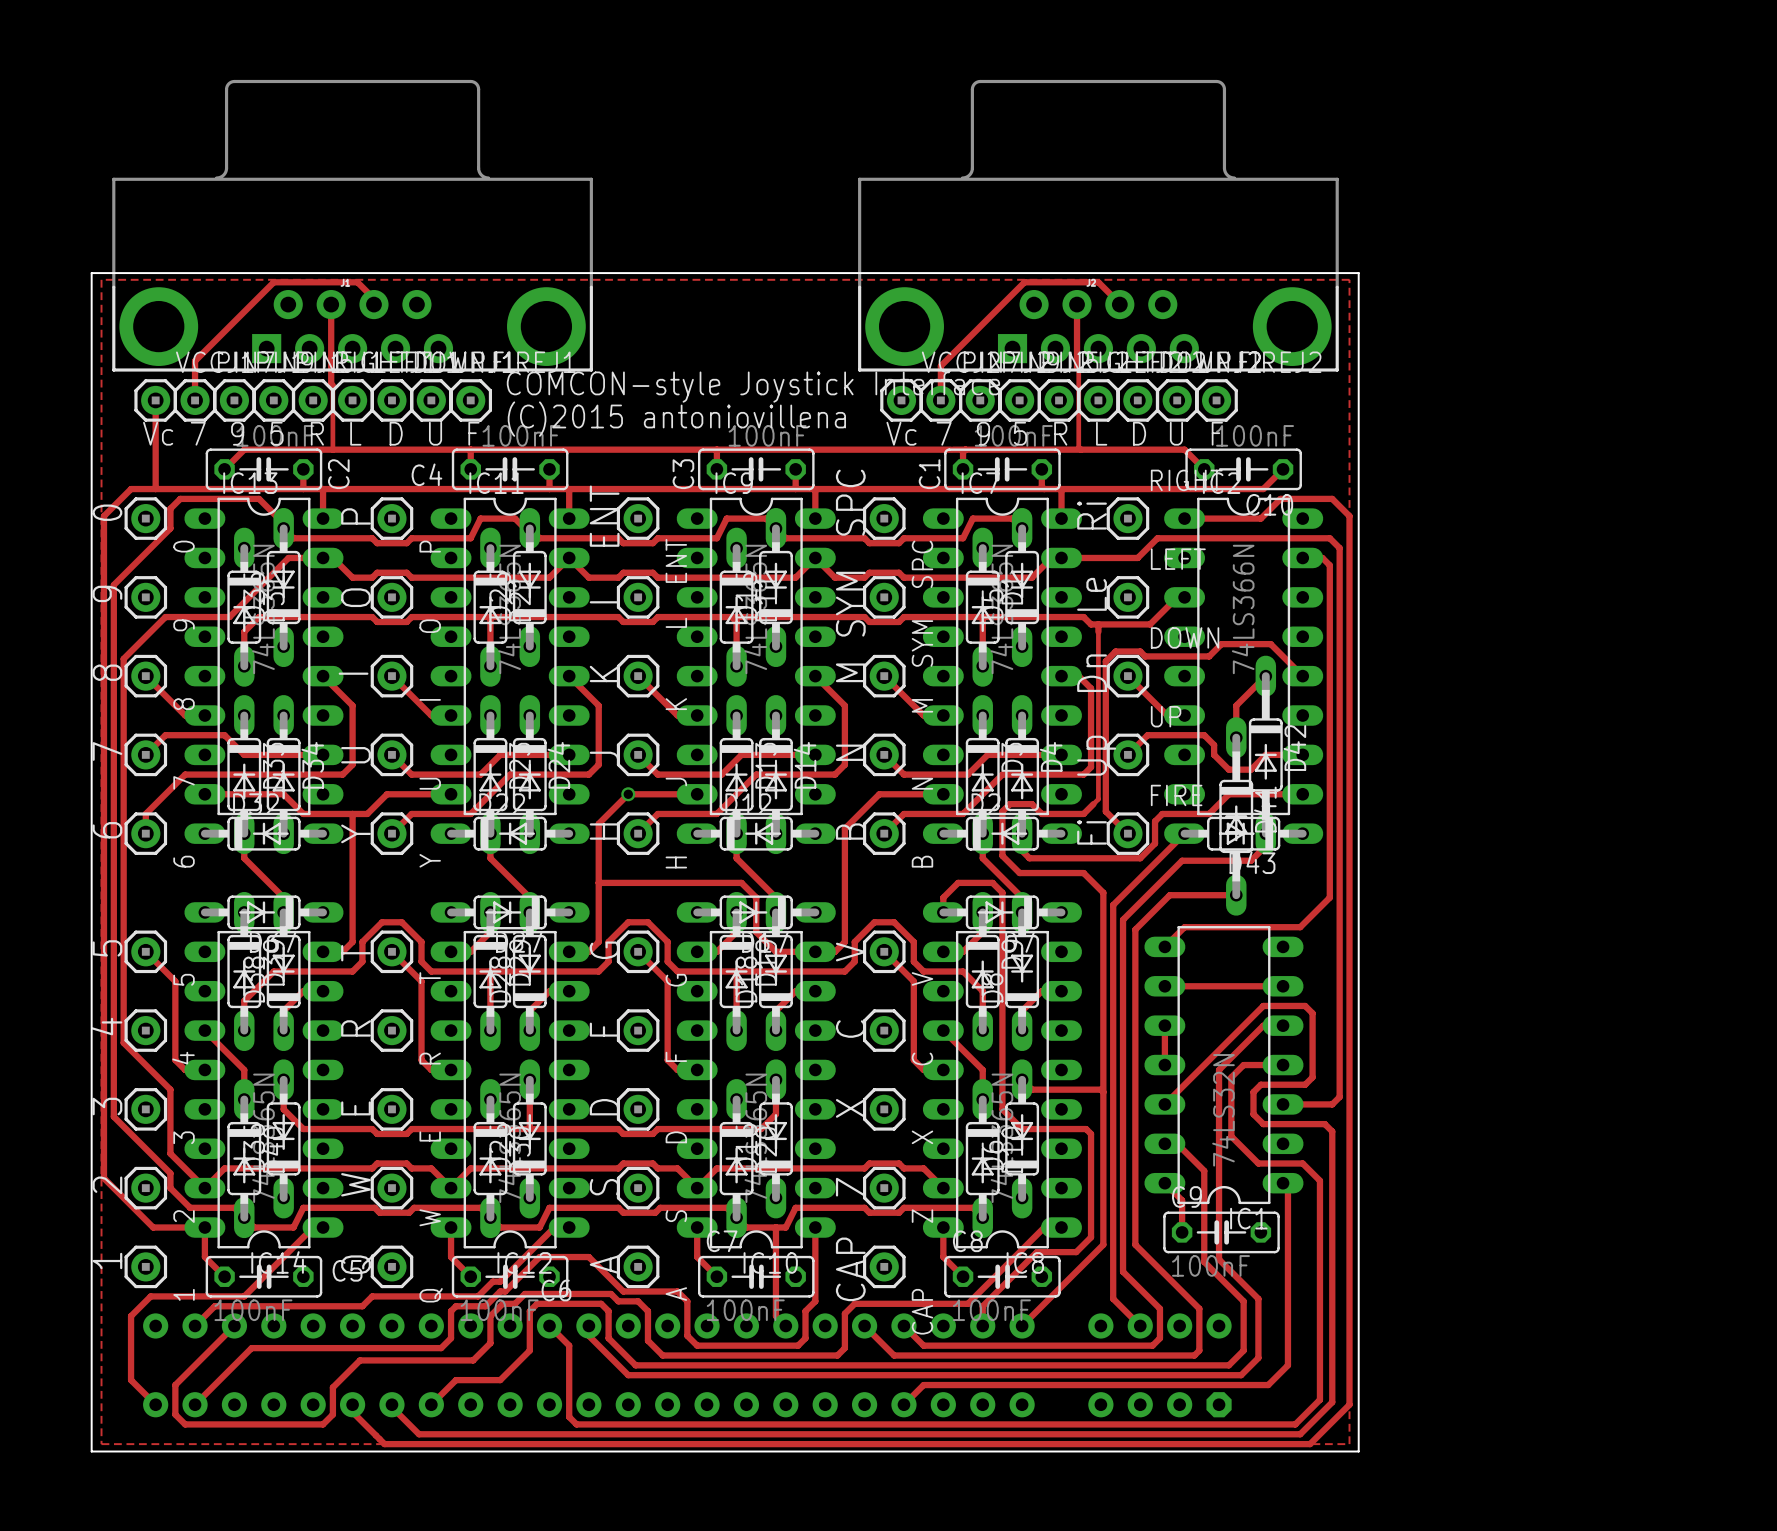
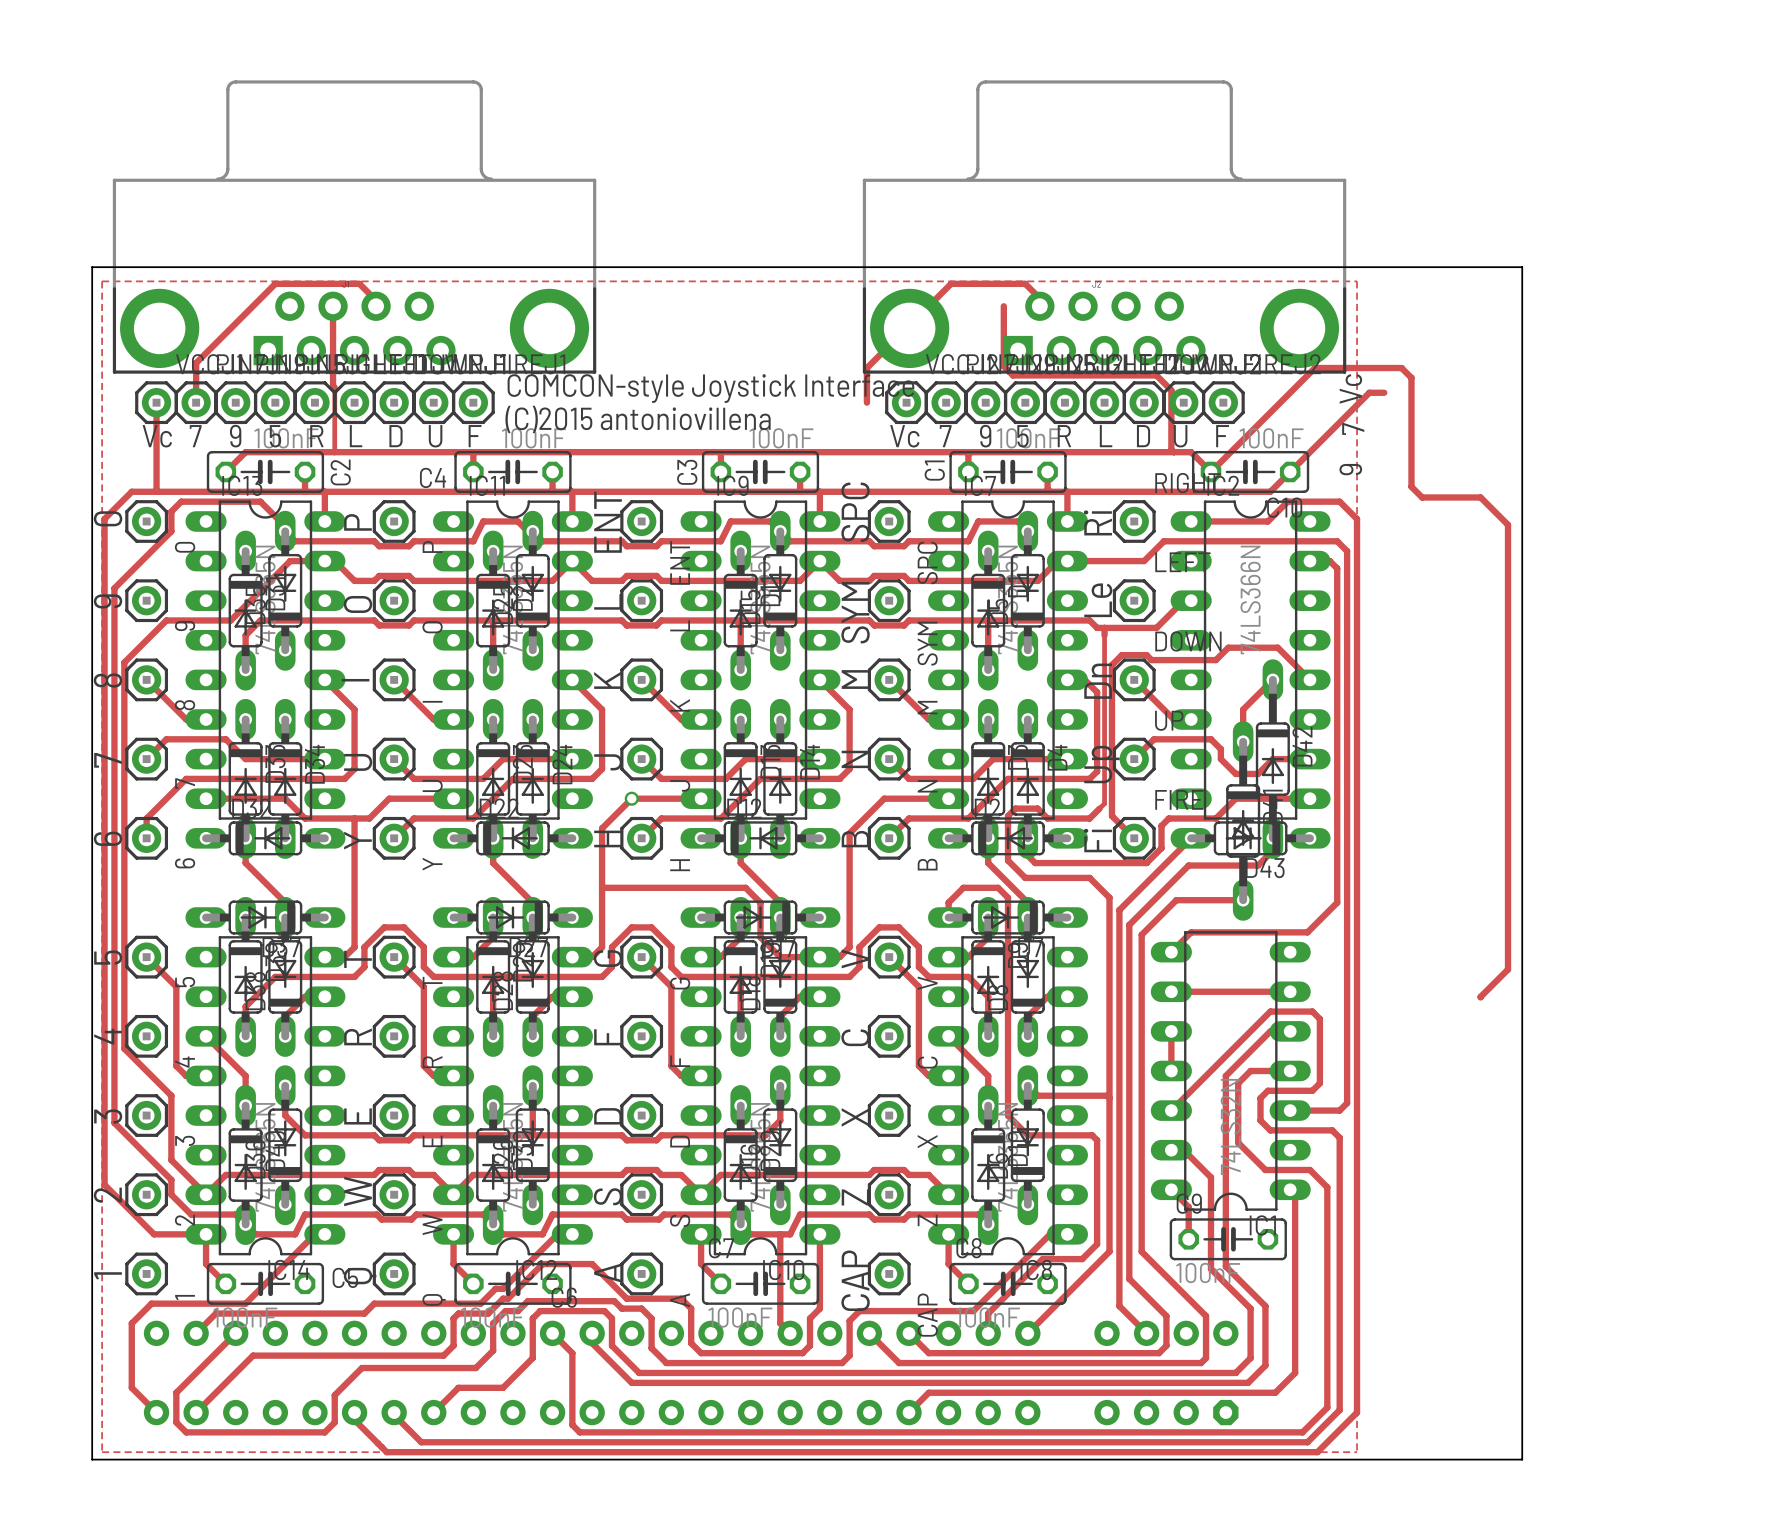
board edge: (91, 273) (1358, 273) (1358, 1451) -> (92, 274) (92, 267) (1522, 267) (1522, 1459) (1366, 1459)
track: none -> (1003, 306) (1003, 366) (1012, 375) (1156, 375) (1171, 390) (1171, 449) (1173, 452)
track: (1077, 304) (1078, 447) (1081, 449) -> none
track: (1119, 304) (1098, 282) (1024, 282) (940, 365) (940, 400) -> (1046, 306) (1025, 283) (951, 283) (866, 368) (866, 402)
text: none -> Vc (1350, 388)
track: none -> (1384, 392) (1369, 392) (1290, 471)
text: none -> 7 (1353, 429)
track: none -> (1210, 471) (1314, 368) (1401, 368) (1411, 377) (1411, 486) (1422, 497) (1480, 497) (1508, 524) (1508, 969) (1480, 997)
text: none -> 9 (1350, 469)

